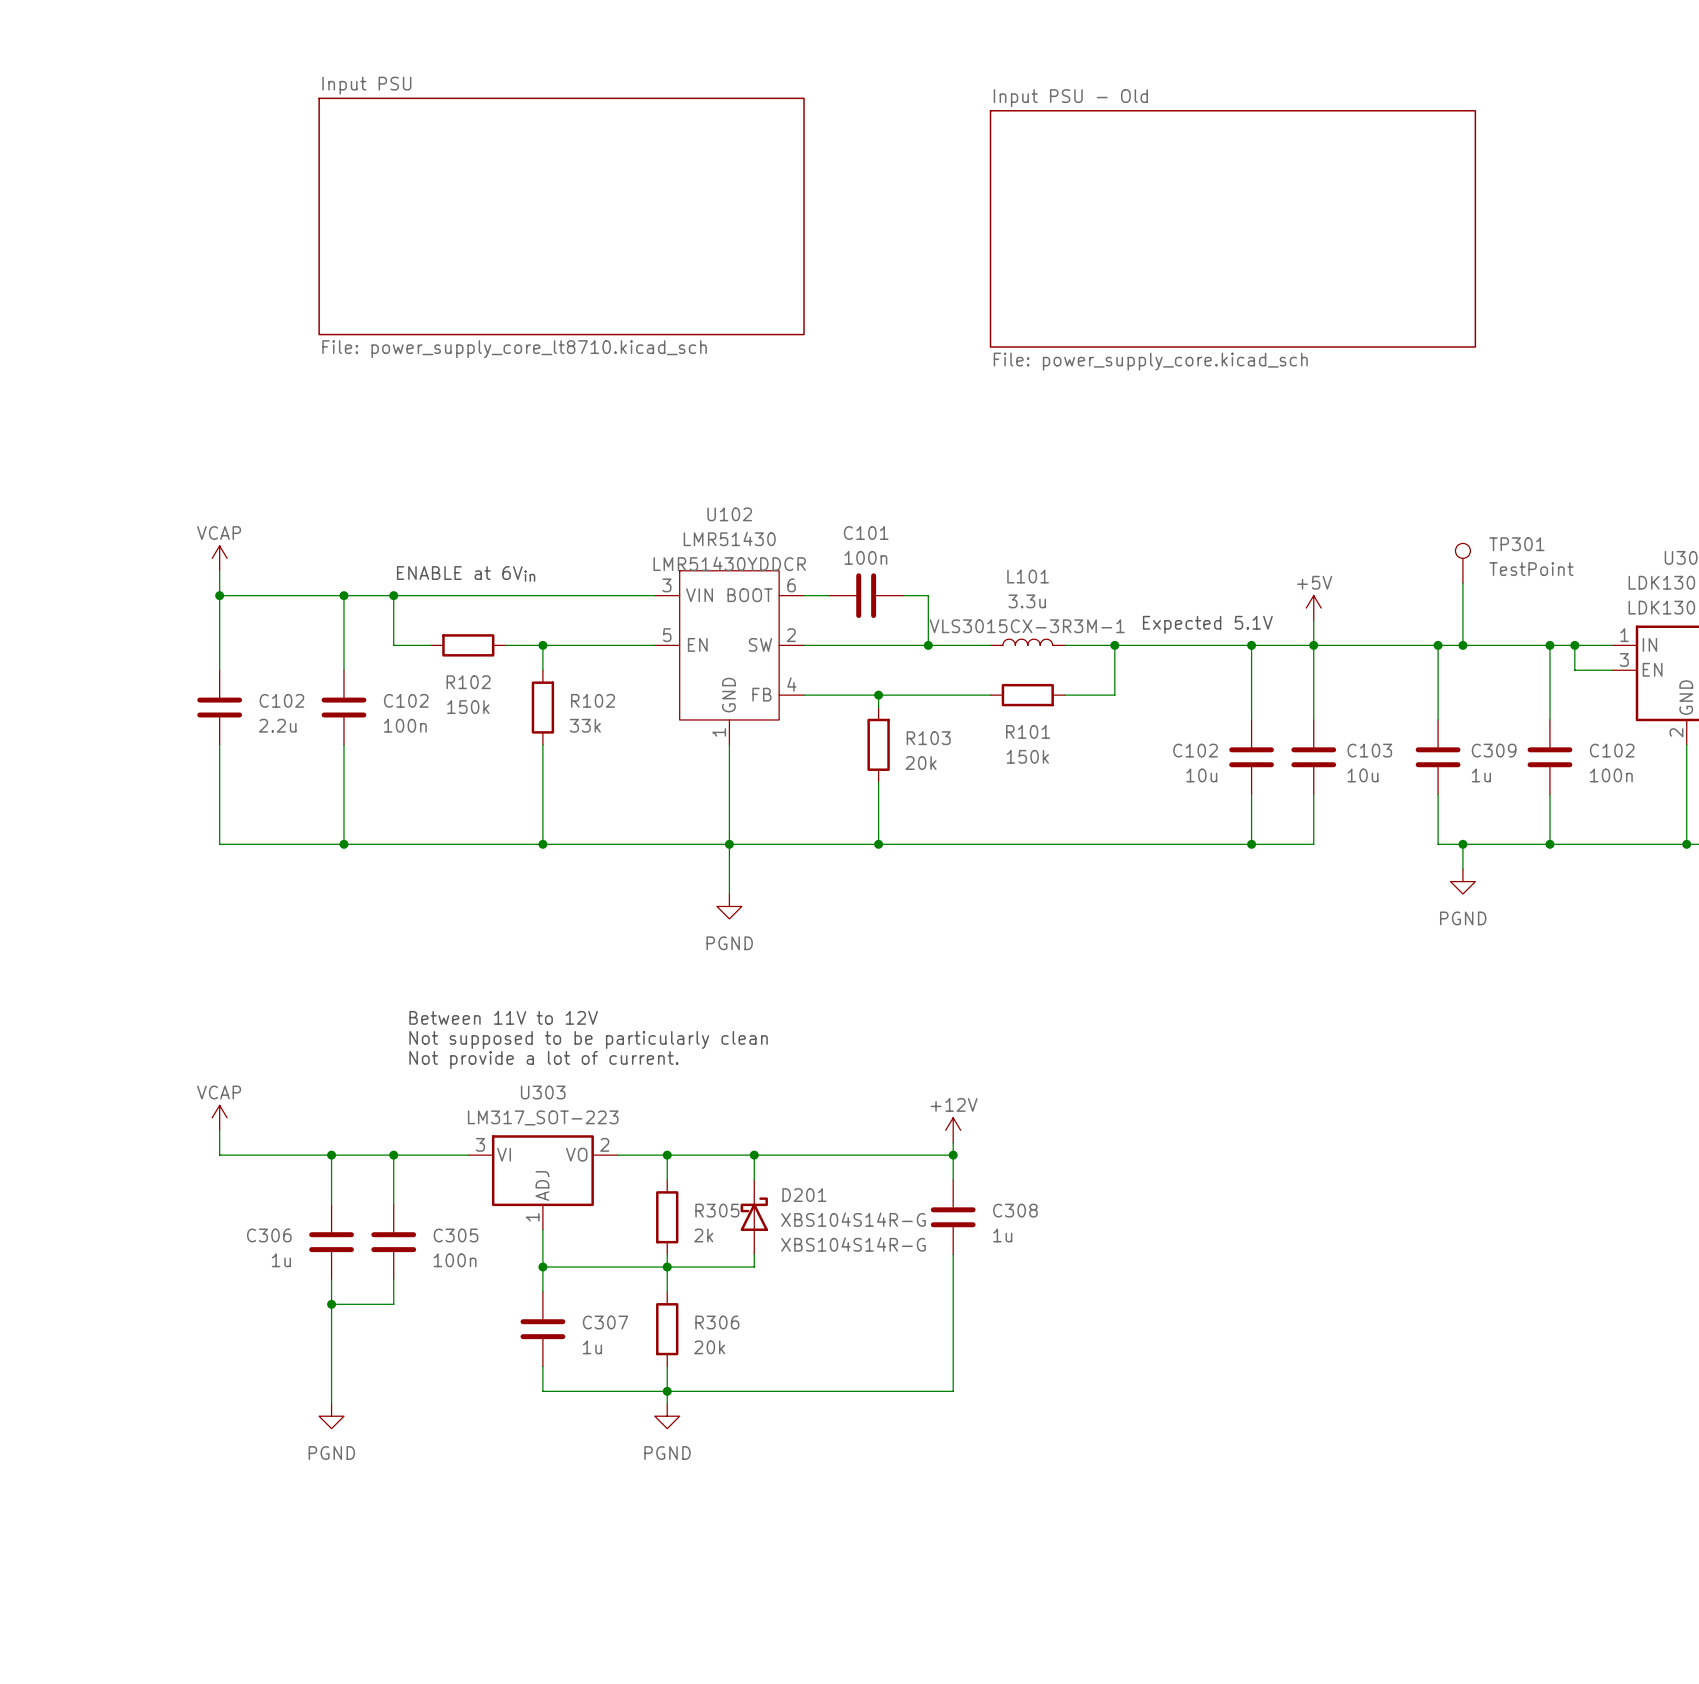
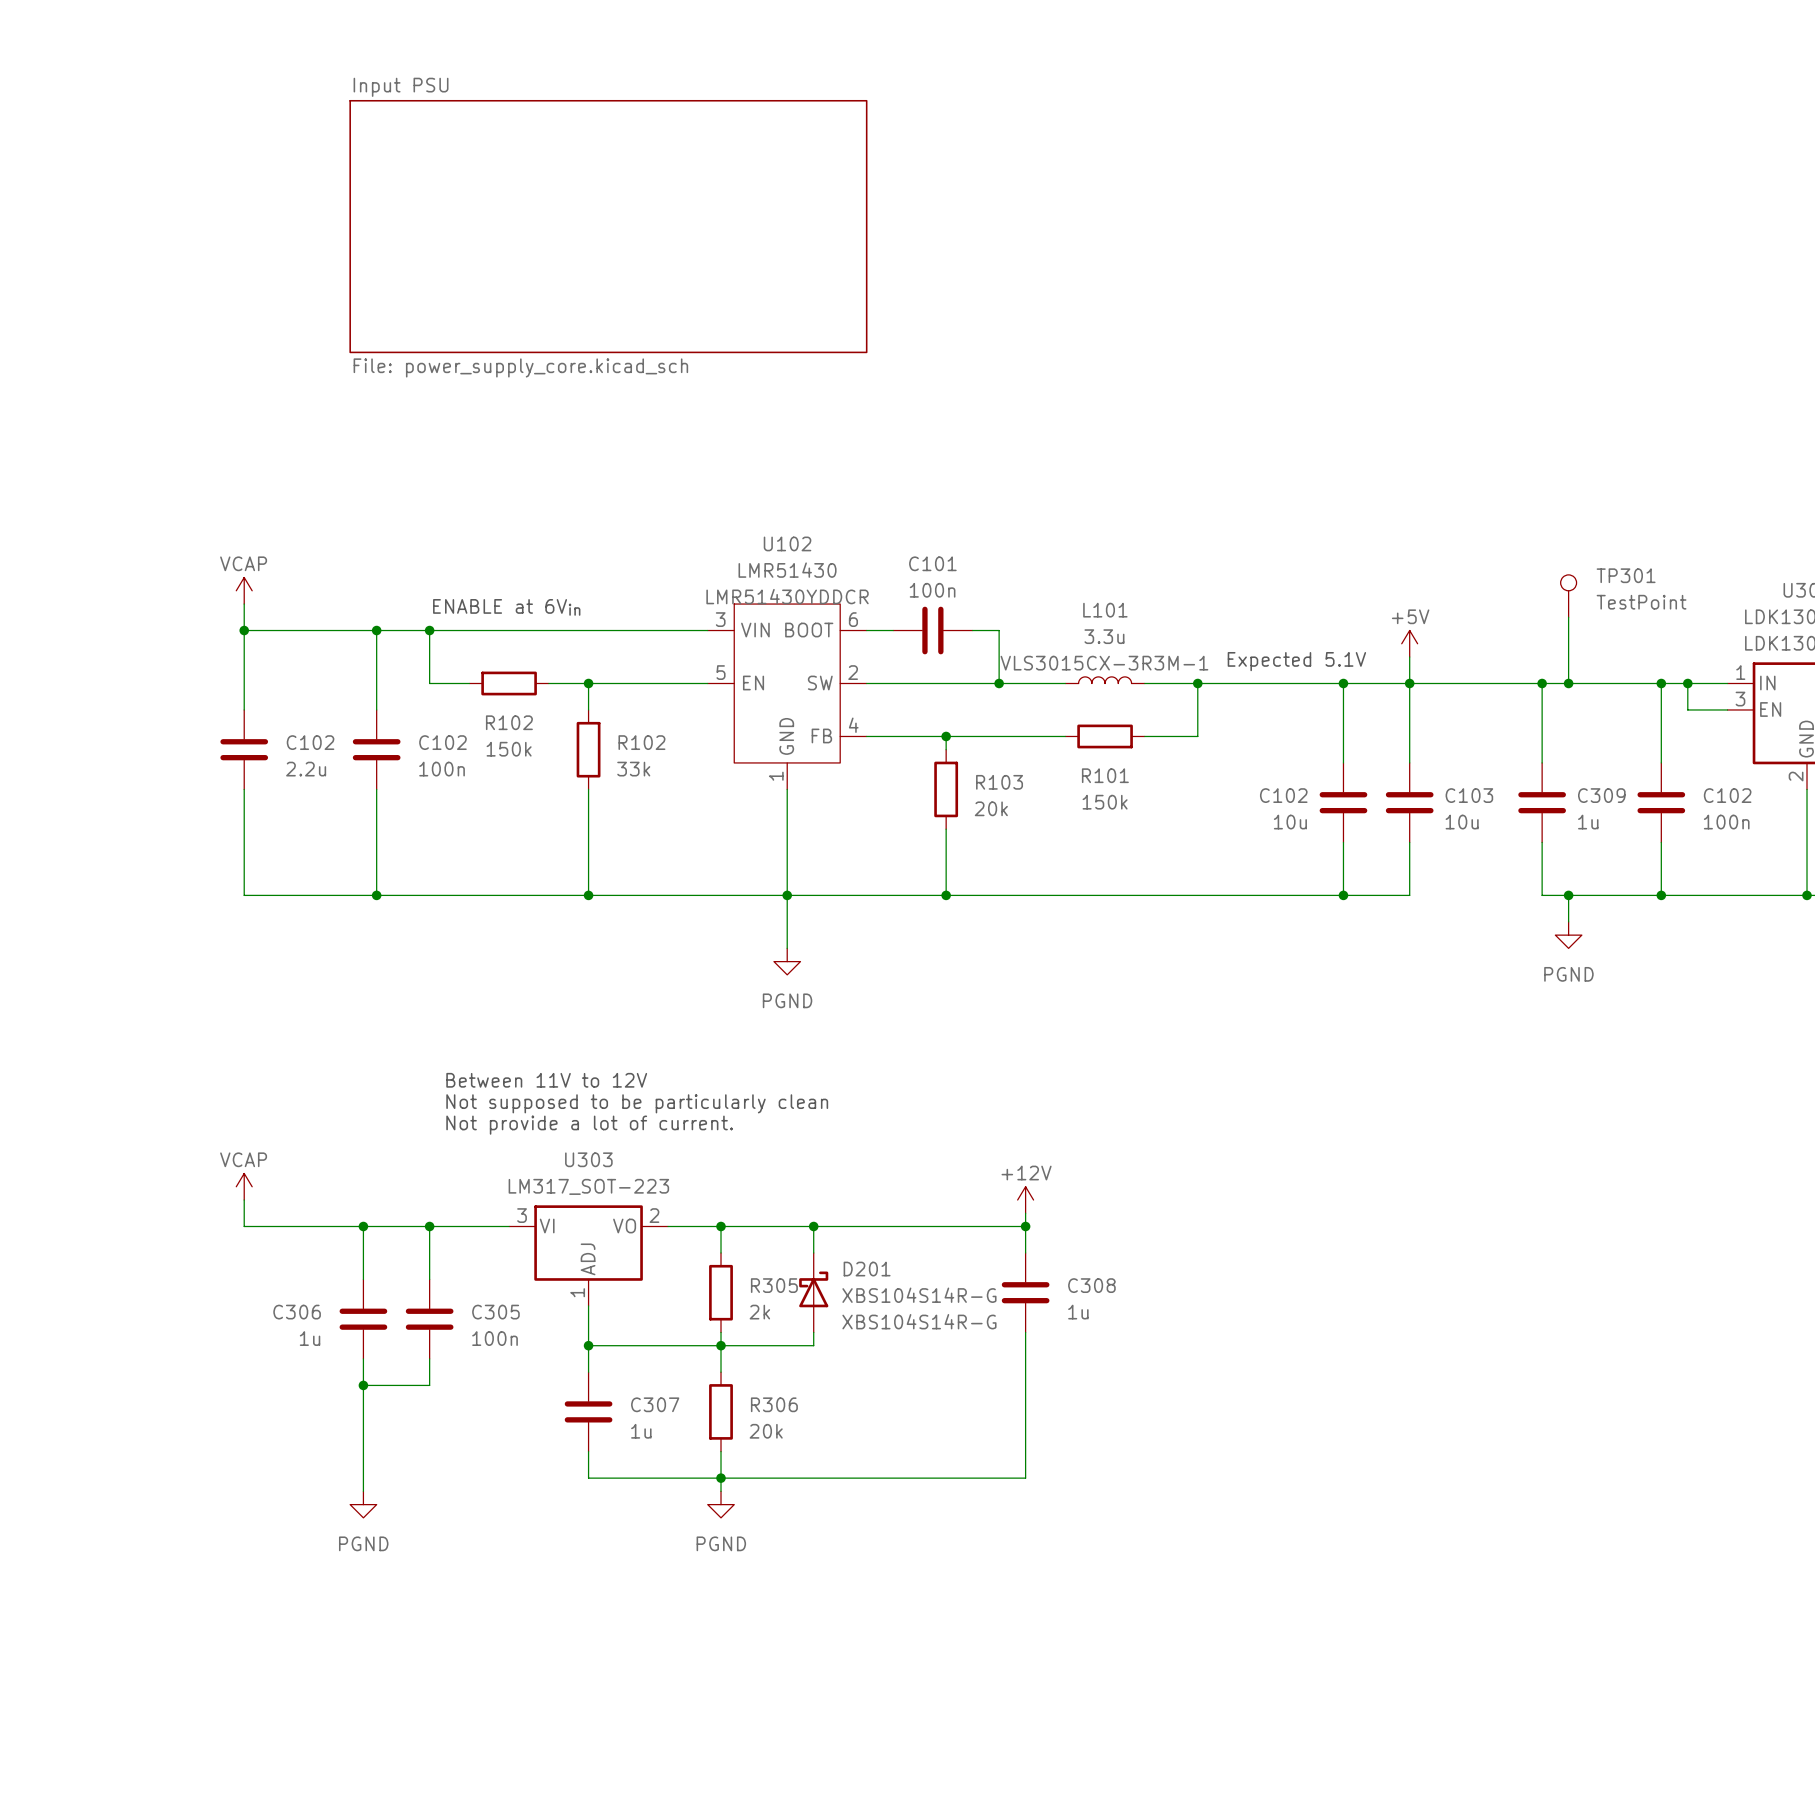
sheet Input PSU - Old: File: power_supply_core.kicad_sch (1232, 228) -> none
sheet Input PSU value: File: power_supply_core_lt8710.kicad_sch (514, 349) -> File: power_supply_core.kicad_sch (520, 367)

